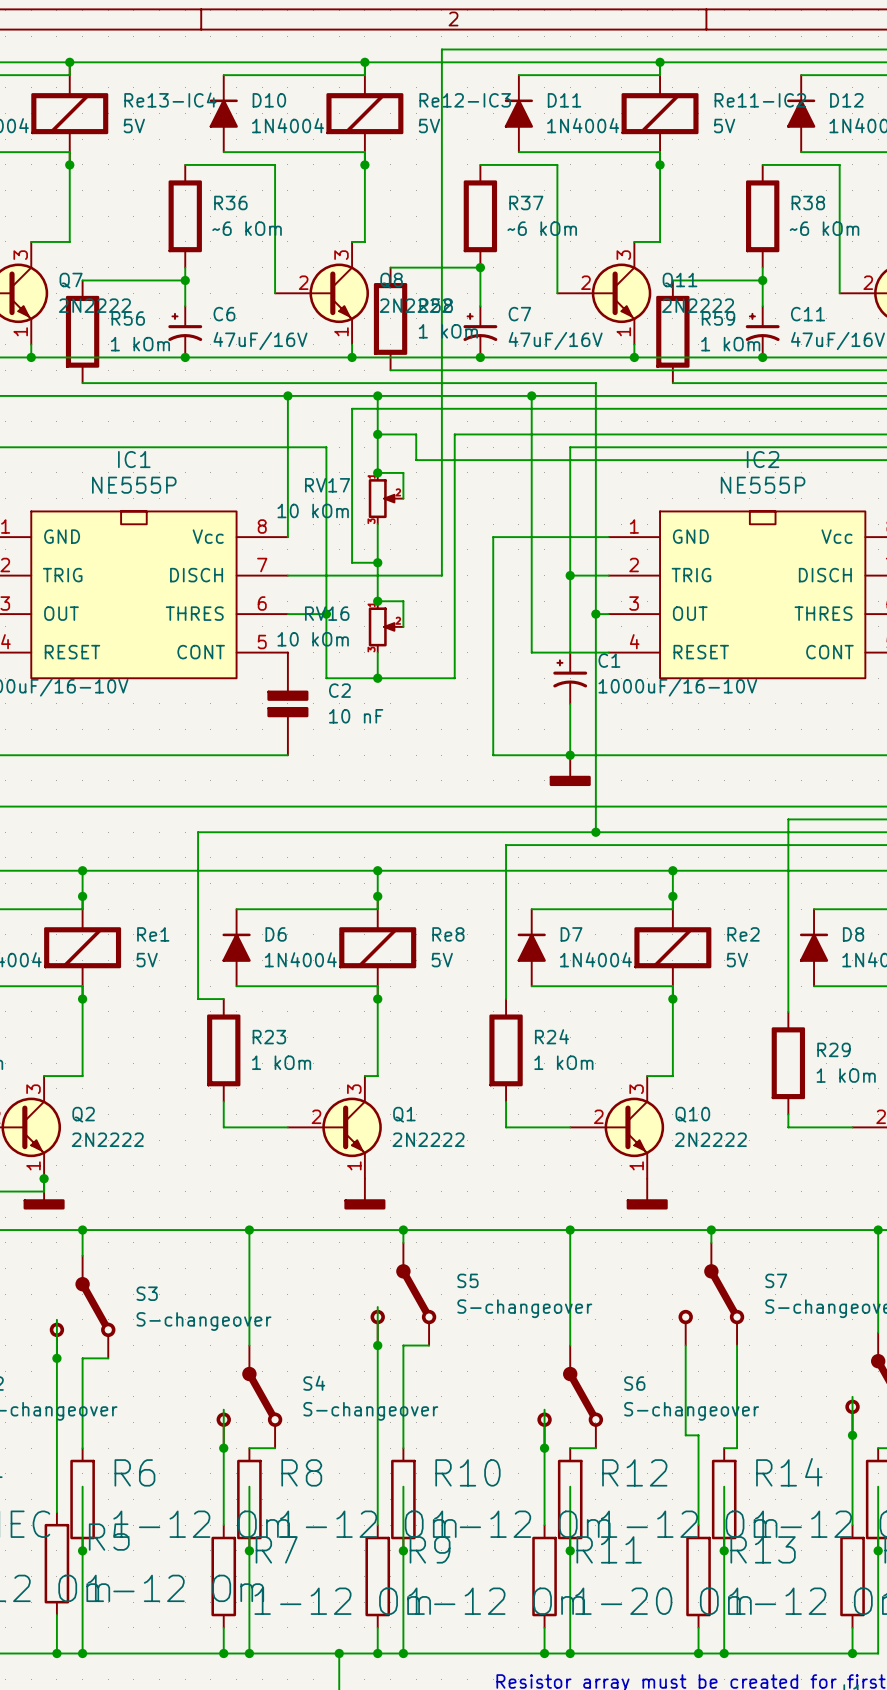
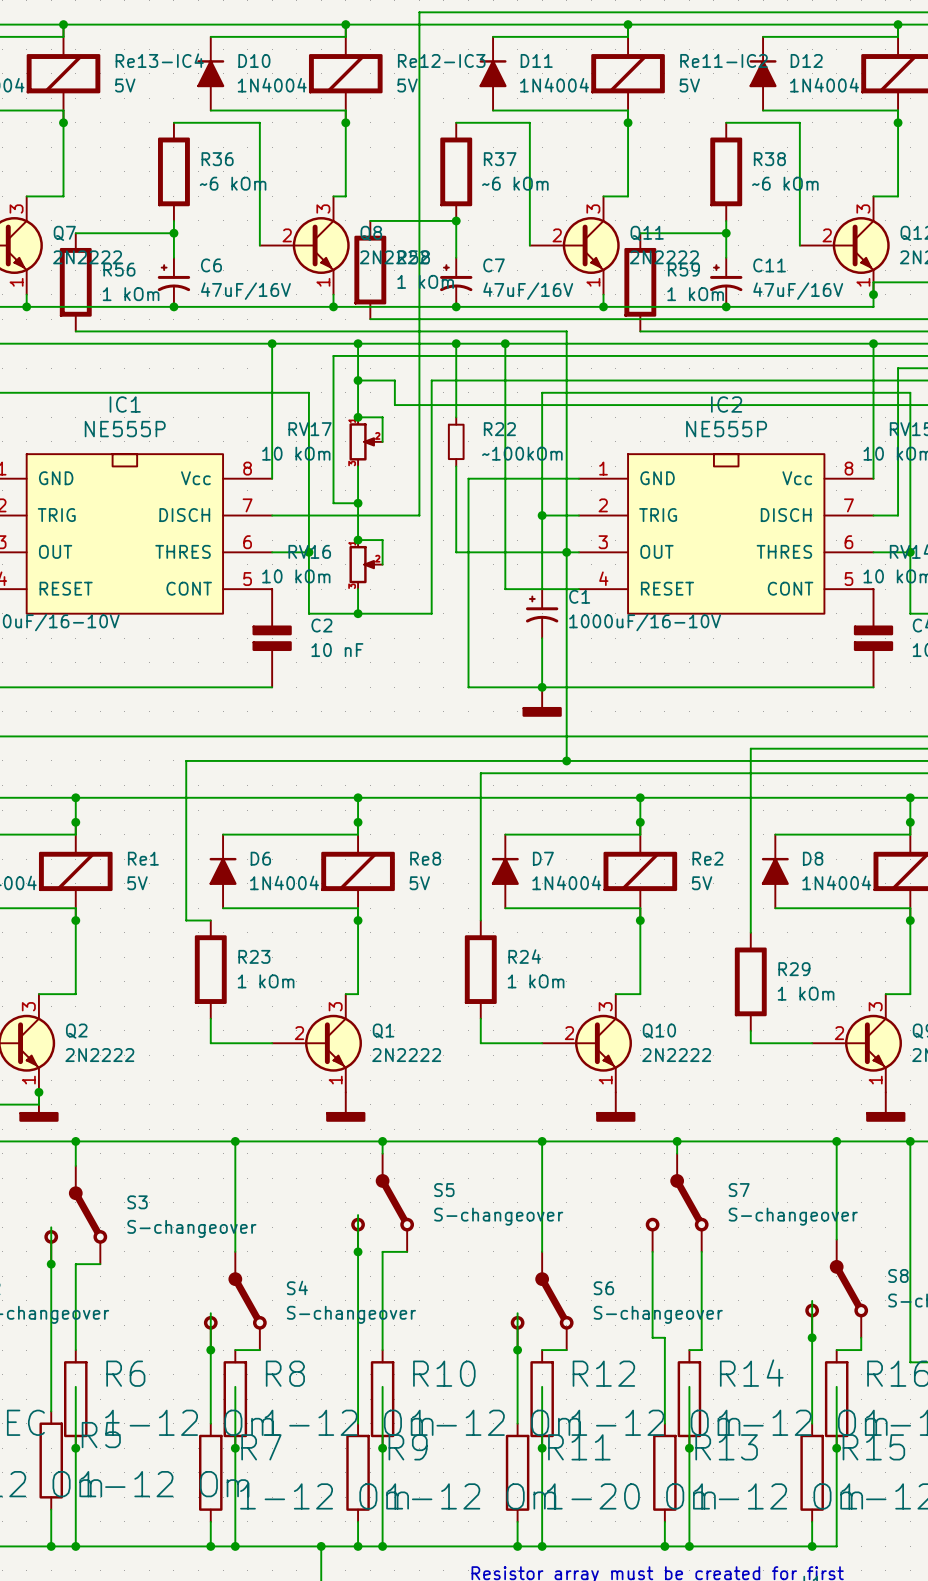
wire: none -> (456, 343) (456, 417)
junction: none -> (456, 343)
R22: none -> ~100kOm (456, 441)
wire: none -> (456, 466) (456, 552) (566, 552)

